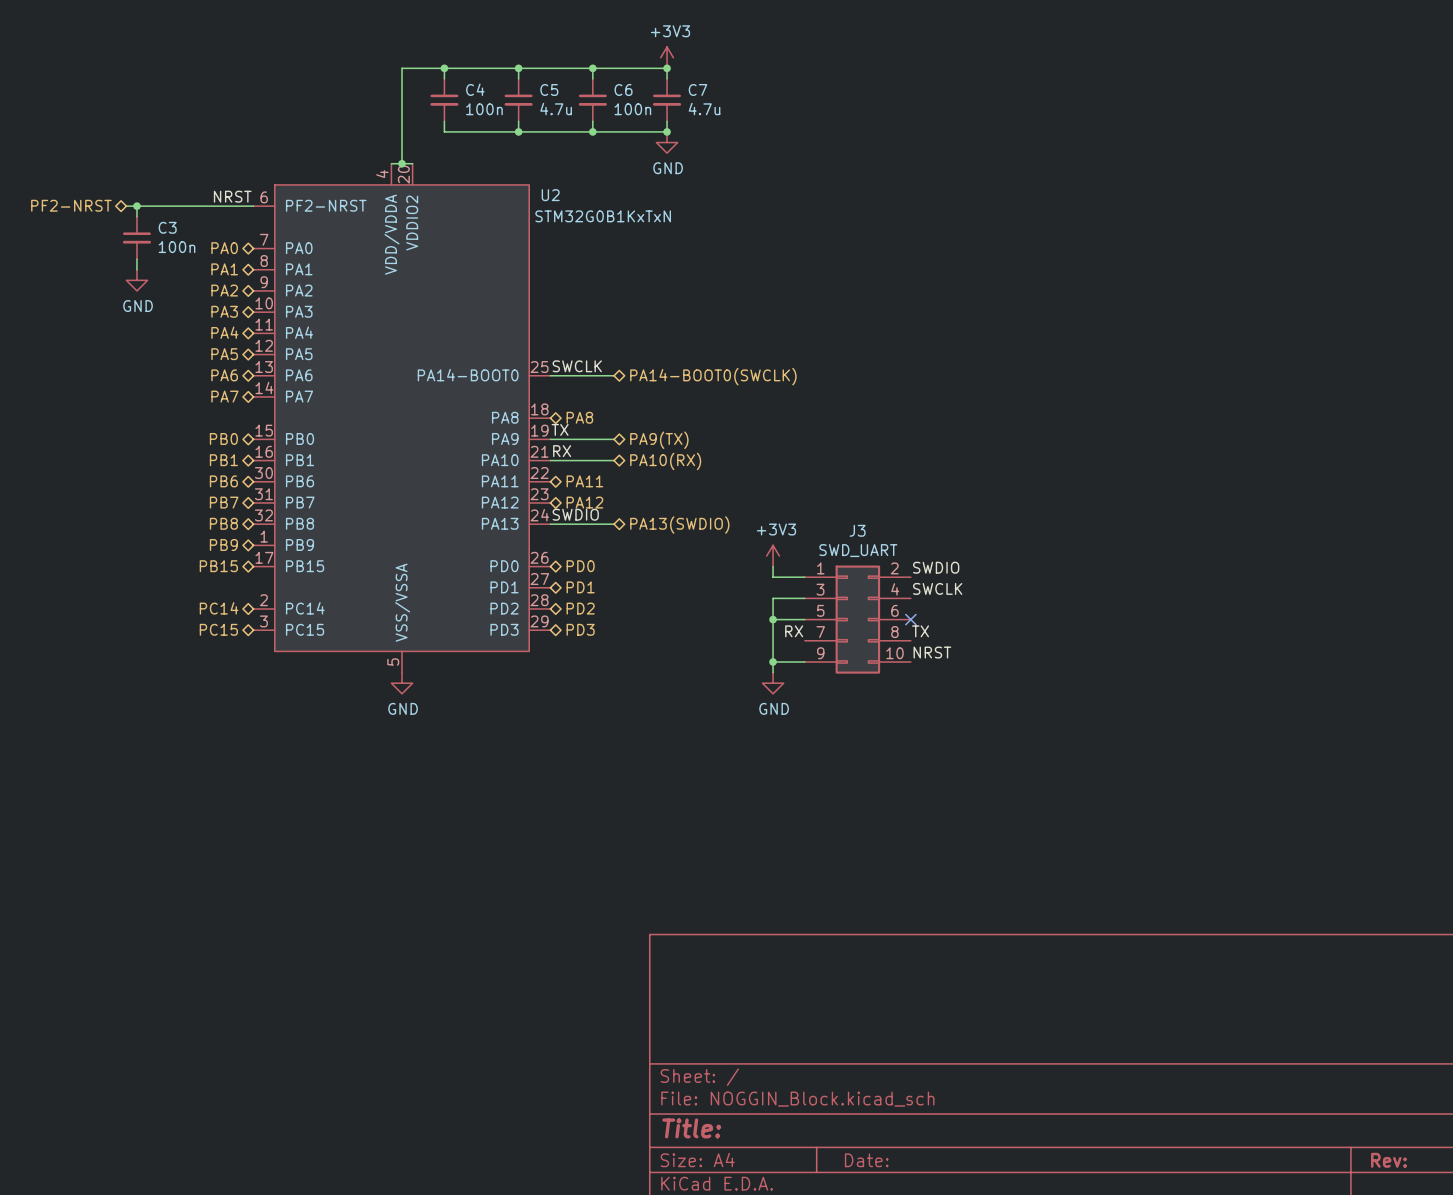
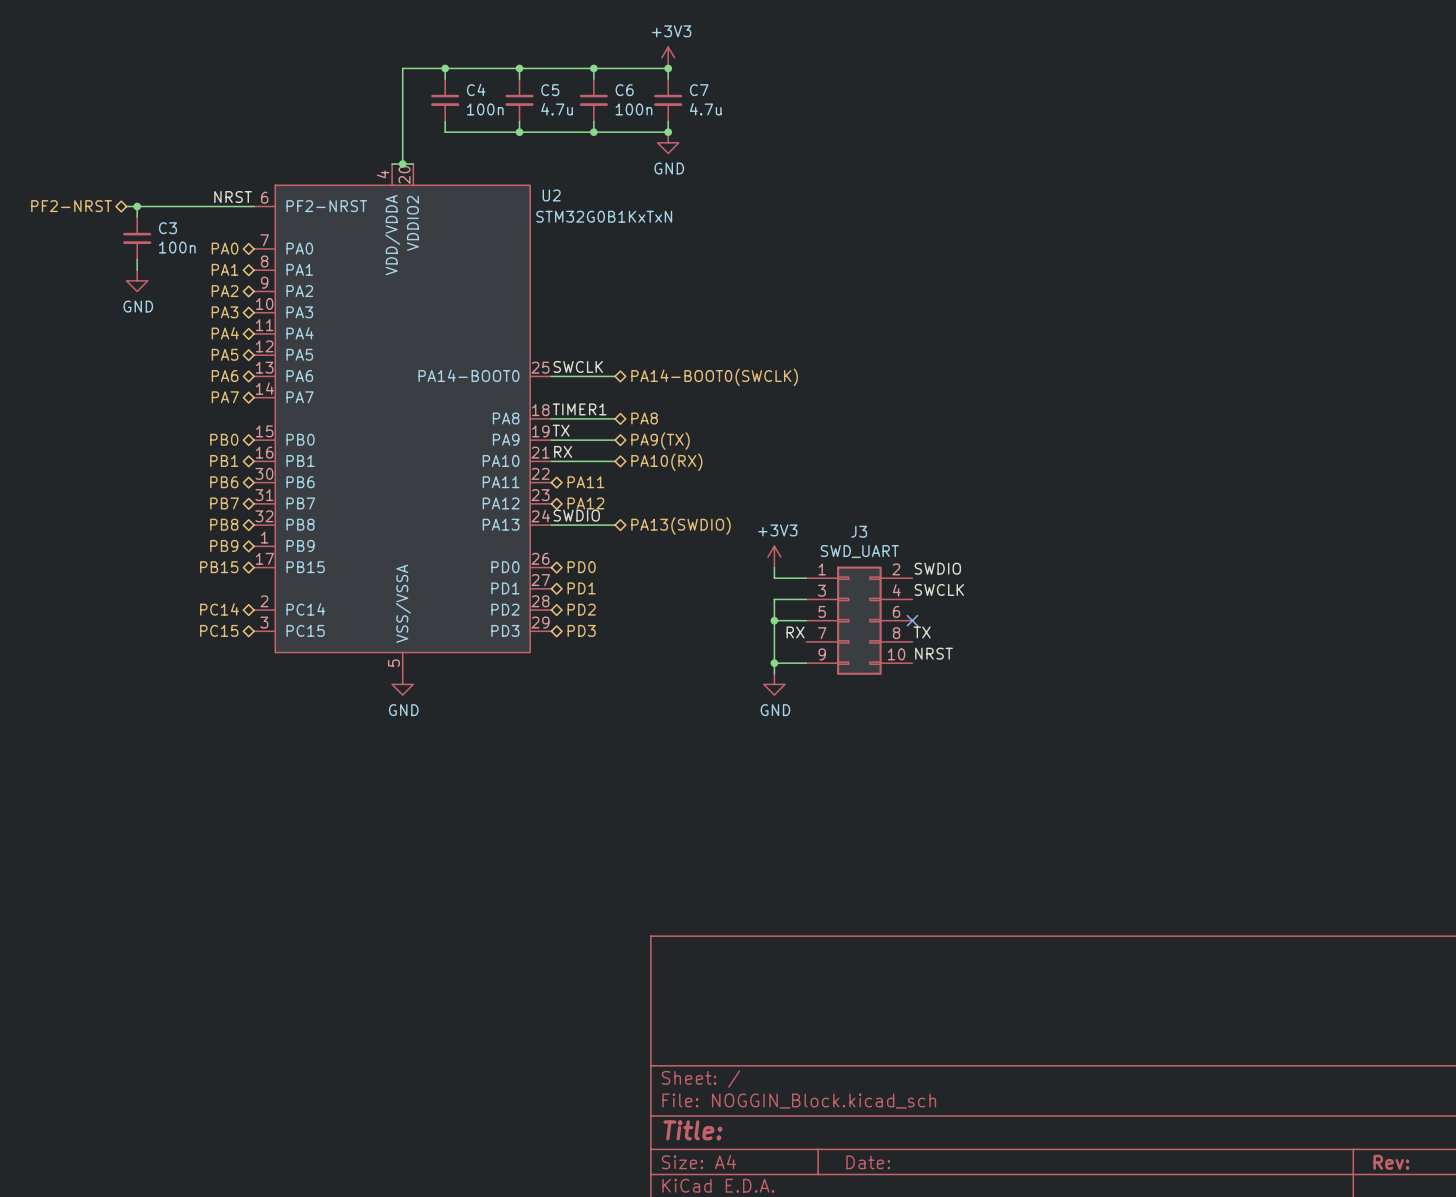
label: none -> TIMER1 (579, 409)
hierarchical label position: PA8 (579, 417) -> PA8 (644, 418)
wire: none -> (551, 418) (615, 418)

